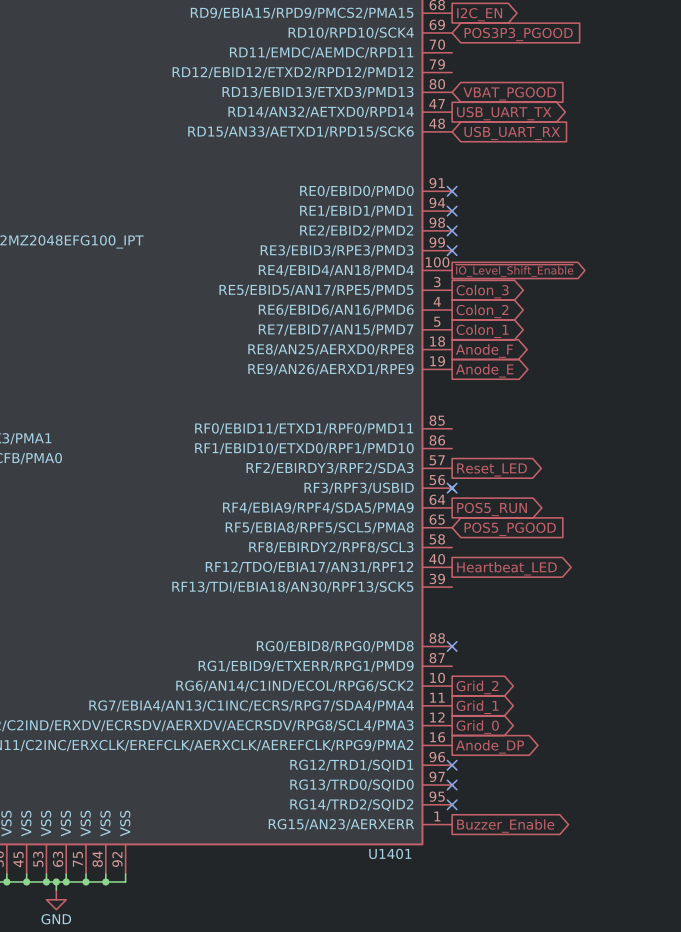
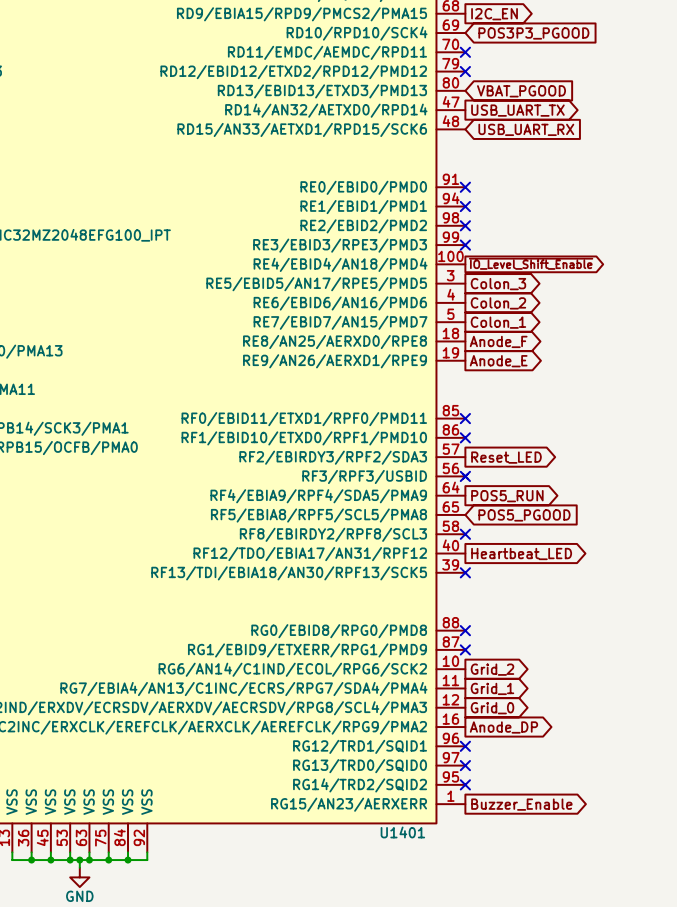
no-connect mark: none -> (465, 52)
no-connect mark: none -> (465, 71)
no-connect mark: none -> (465, 418)
no-connect mark: none -> (465, 437)
no-connect mark: none -> (465, 534)
no-connect mark: none -> (465, 572)
no-connect mark: none -> (465, 649)

